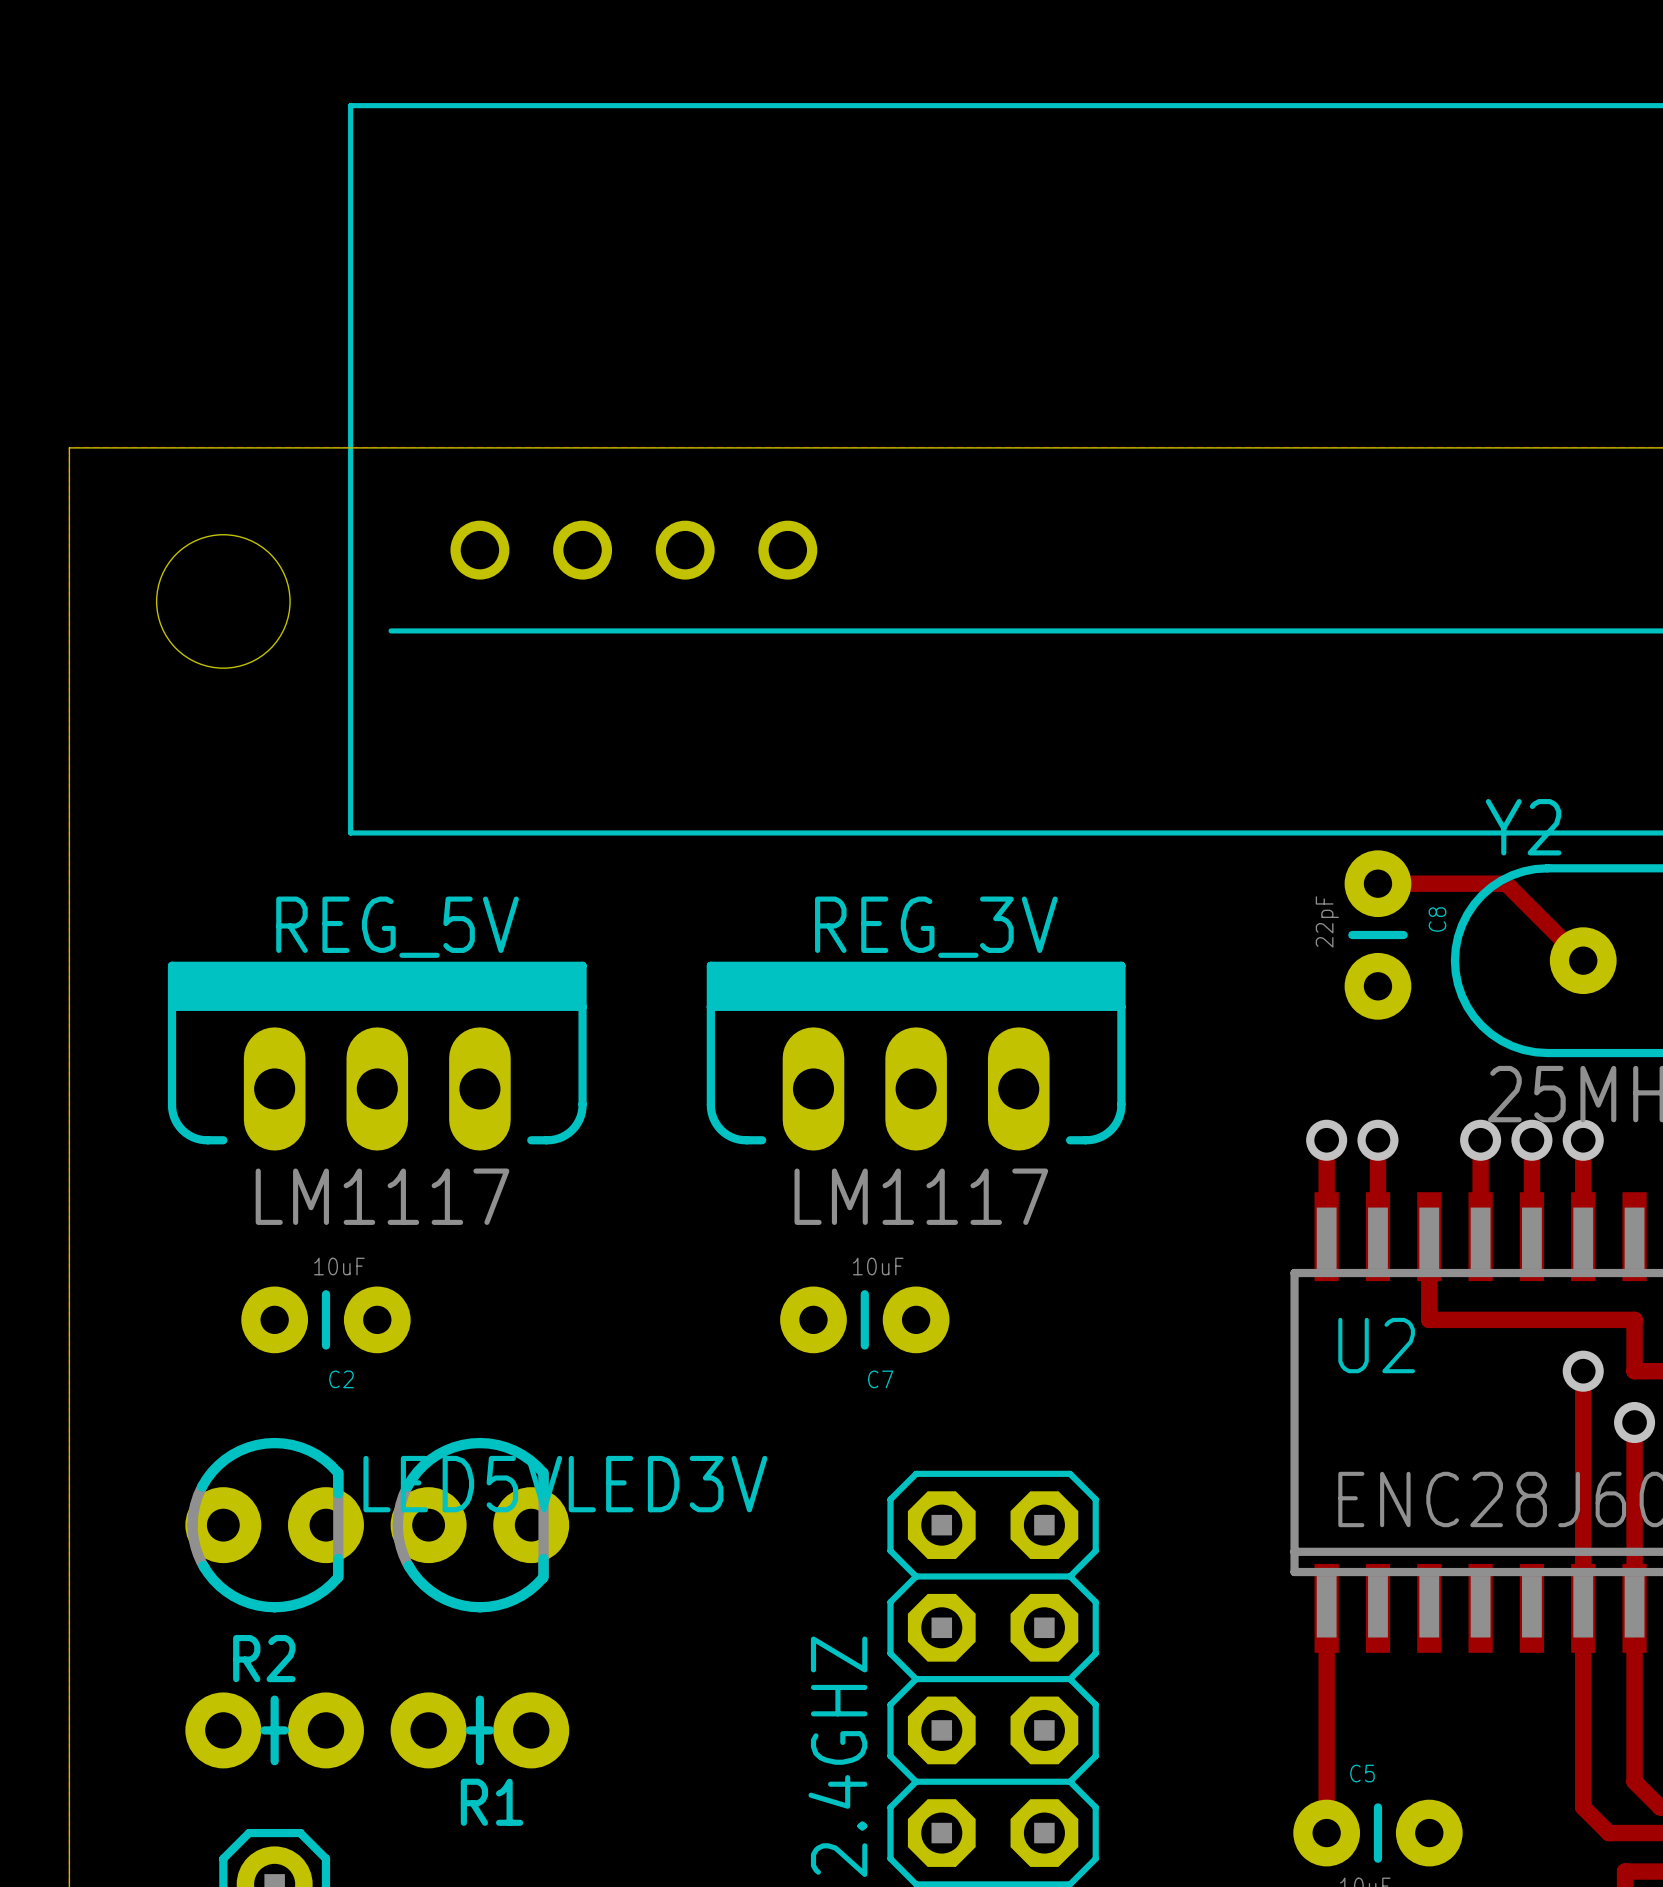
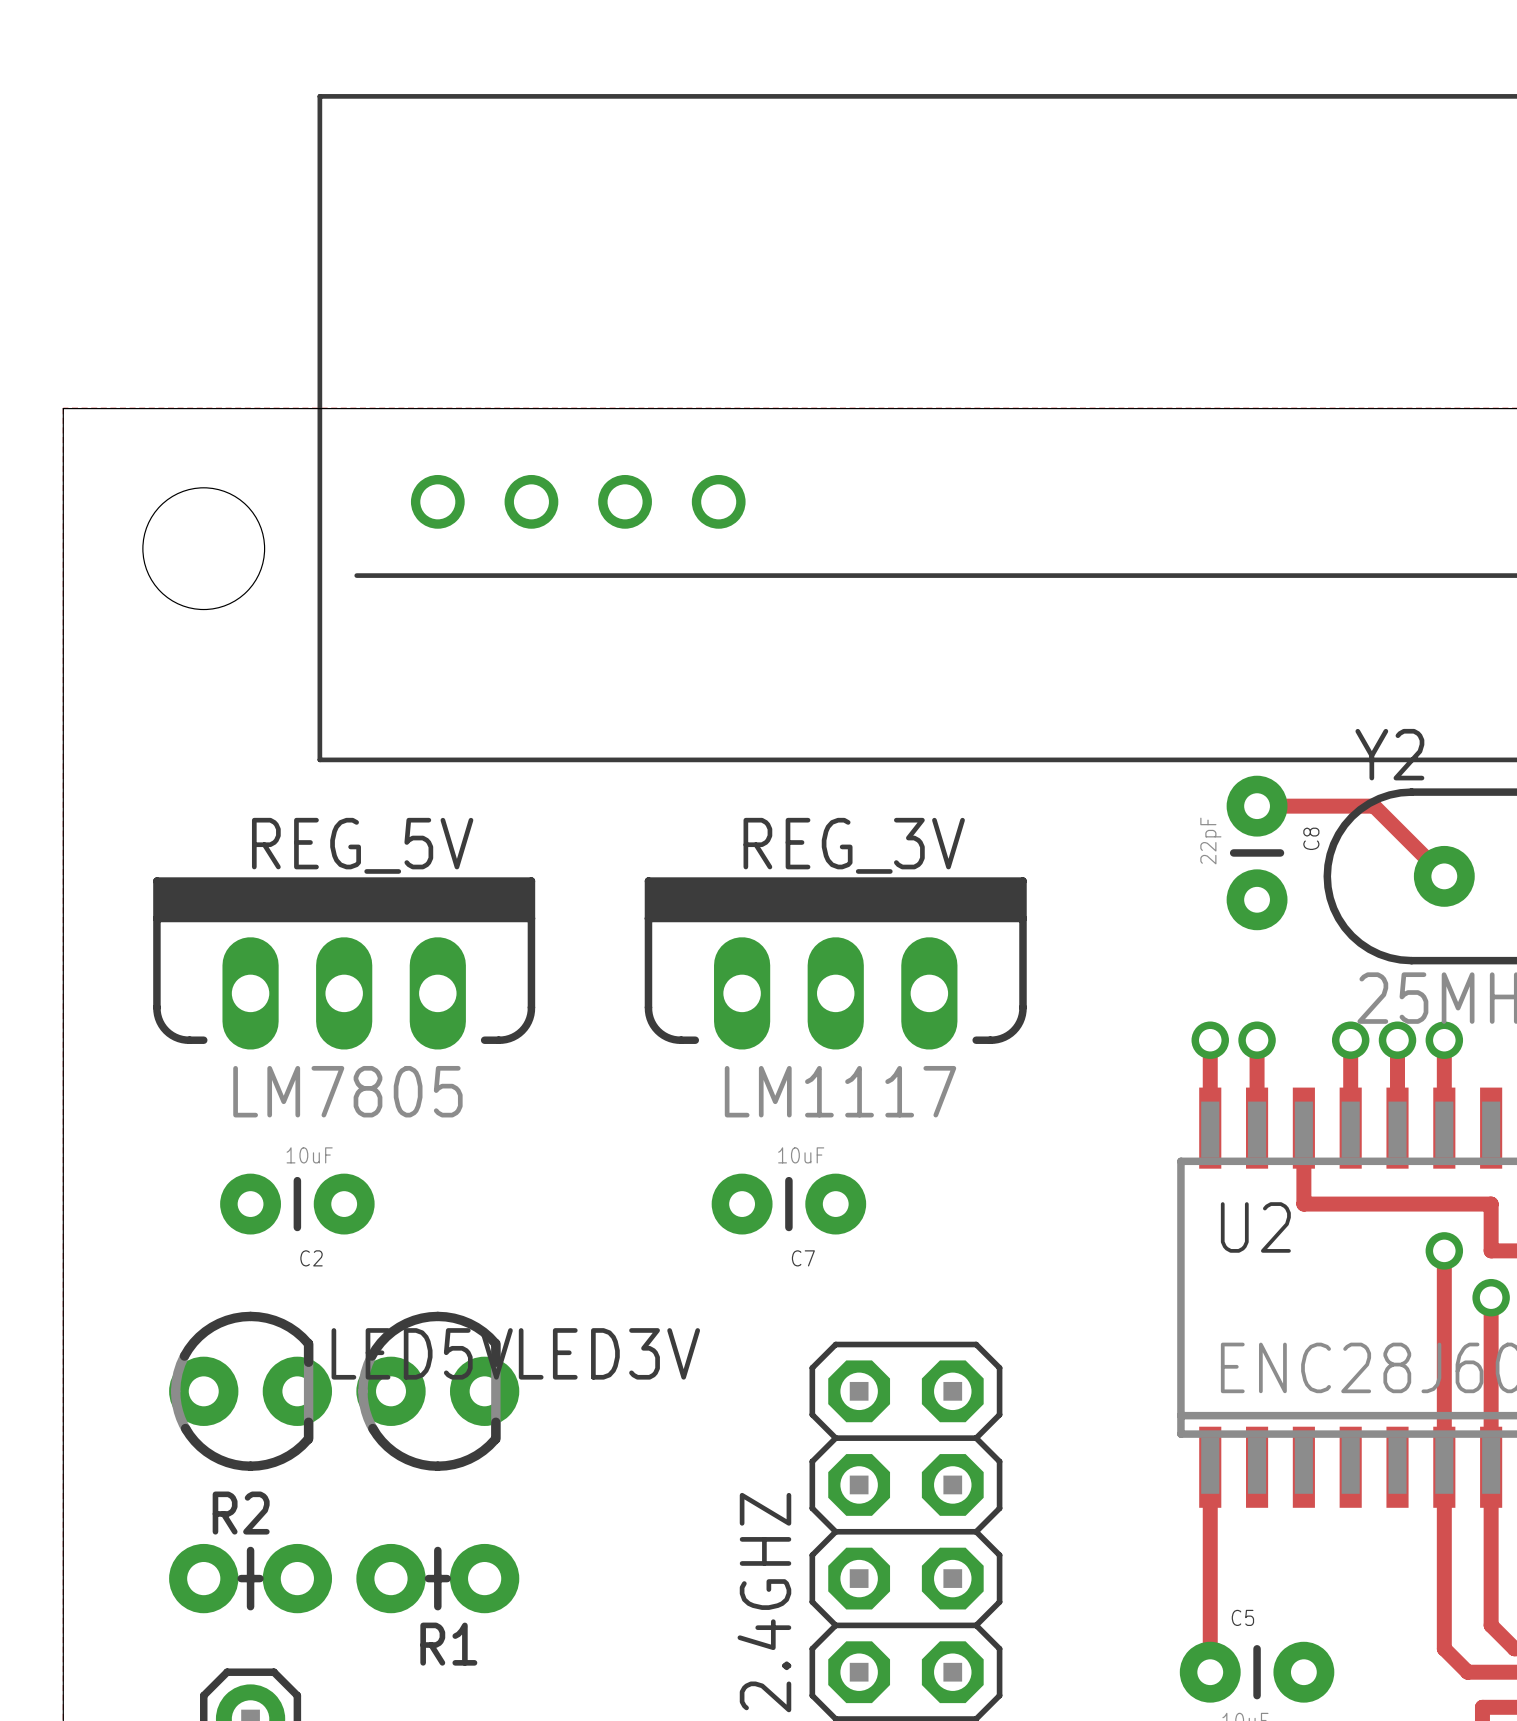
REG_5V value: LM1117 (382, 1196) -> LM7805 (347, 1091)

